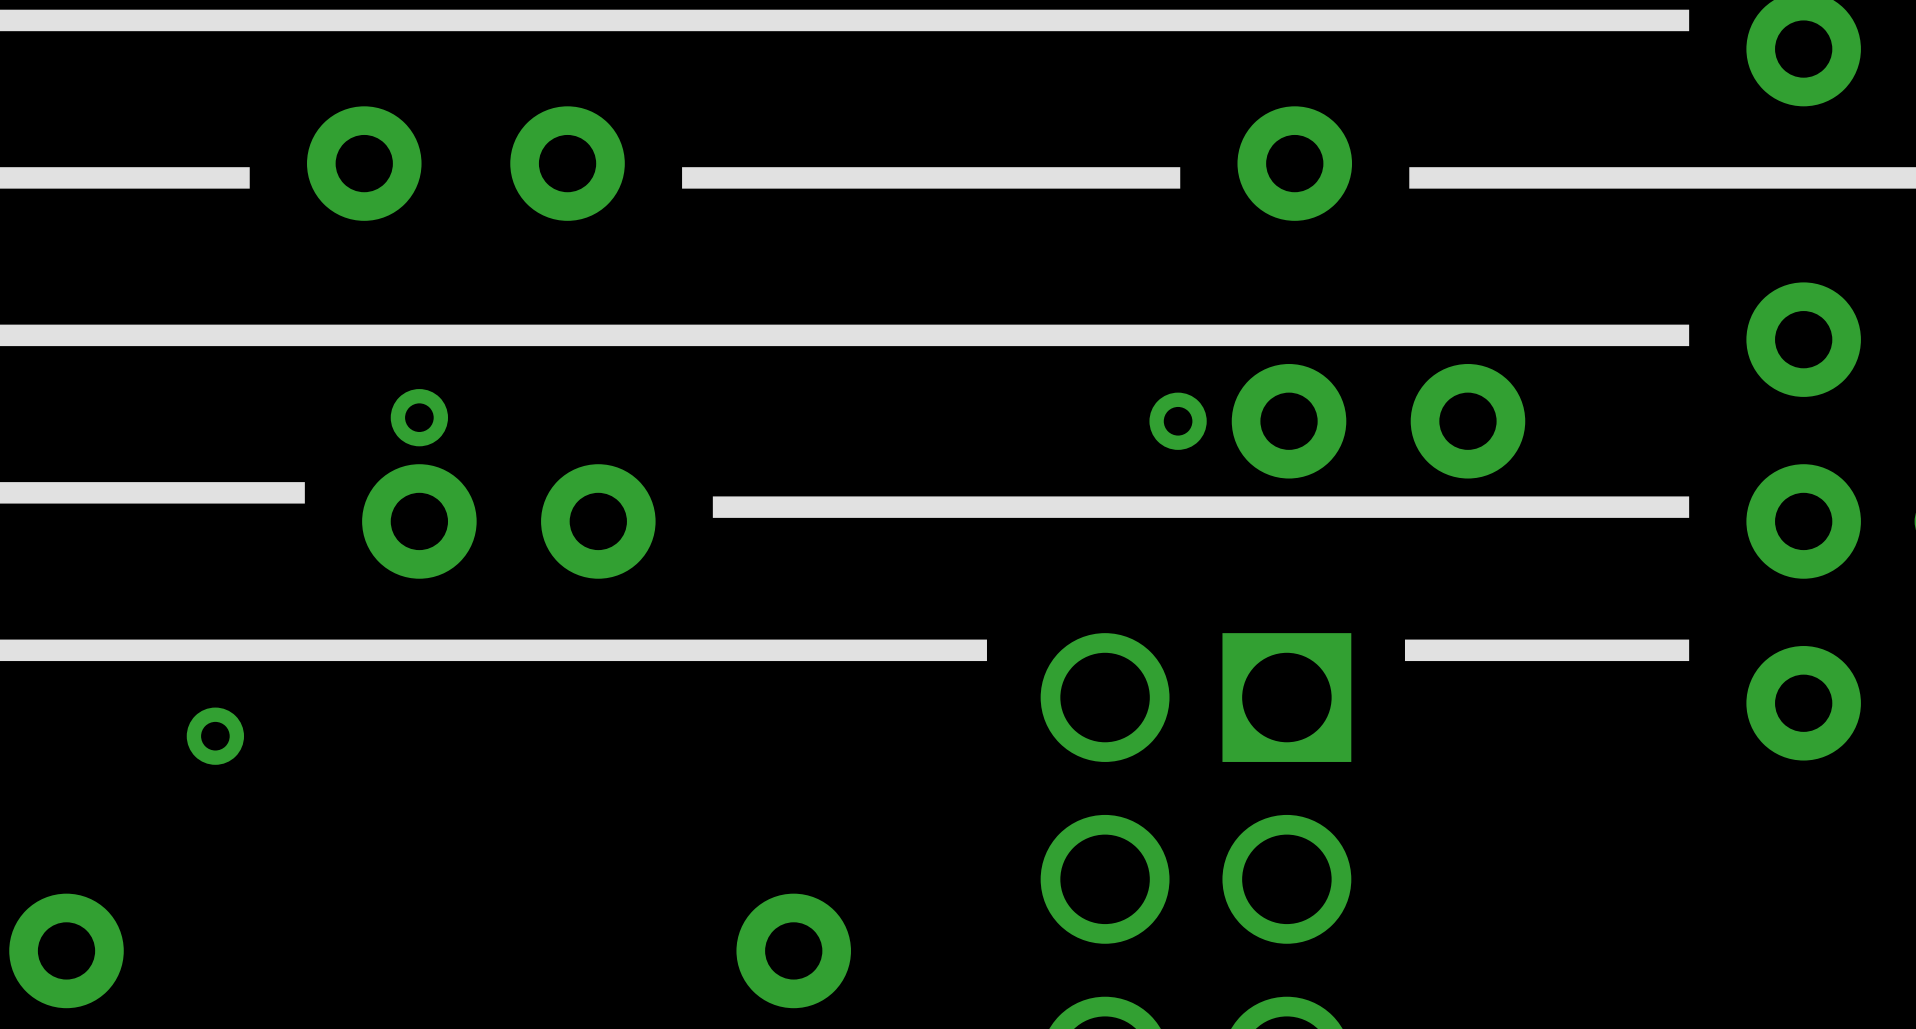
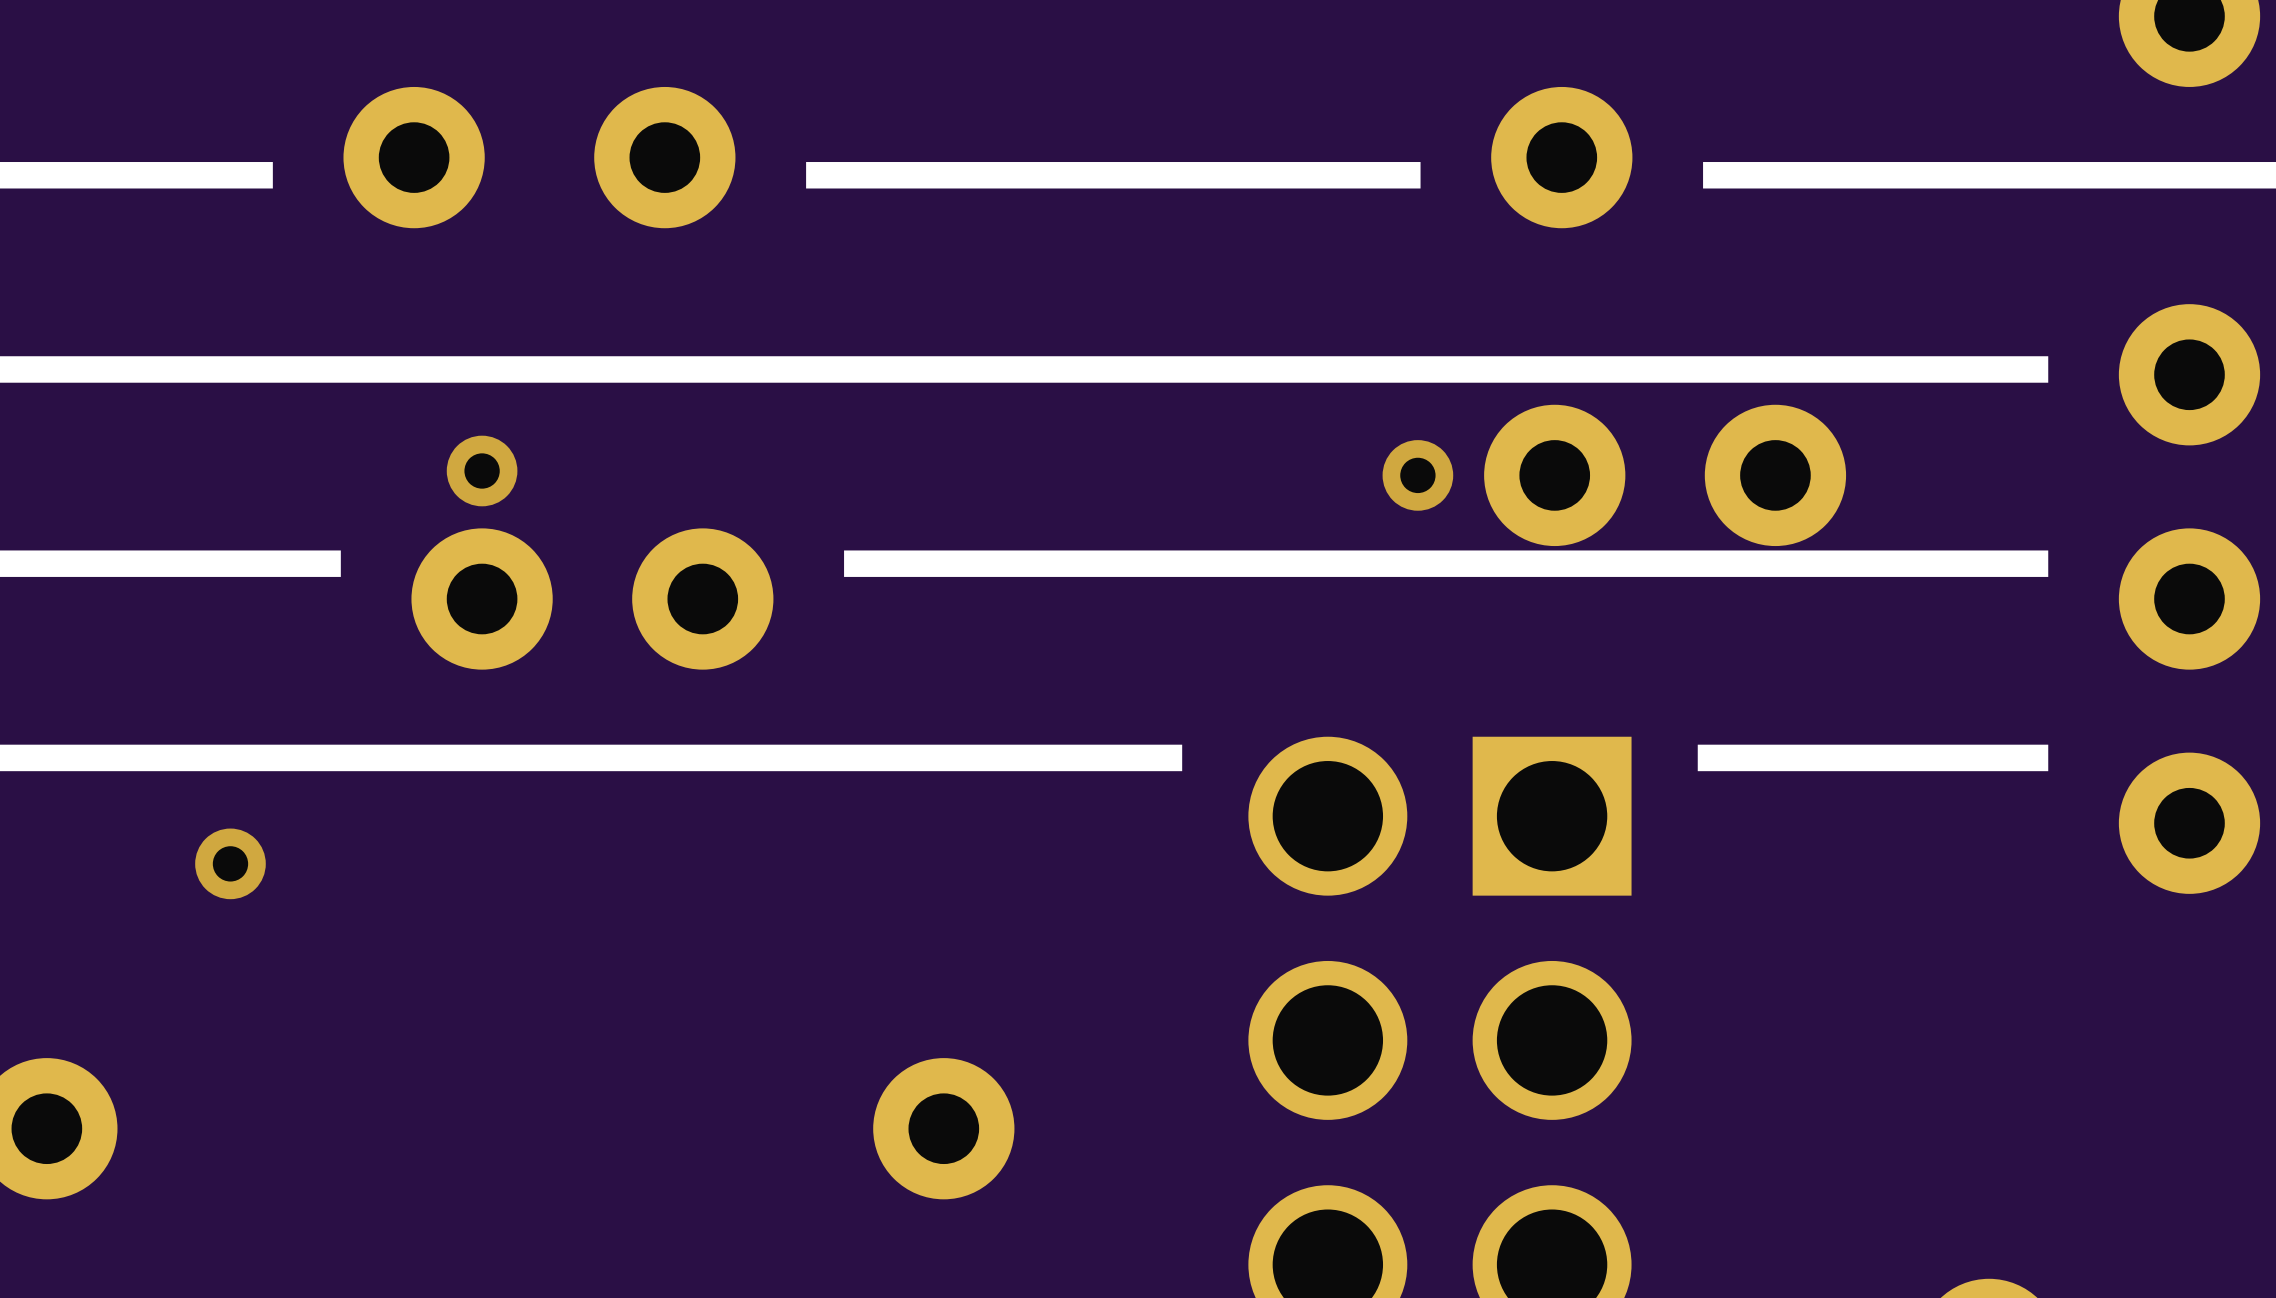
drawing position: (1200, 507) -> (1446, 563)

